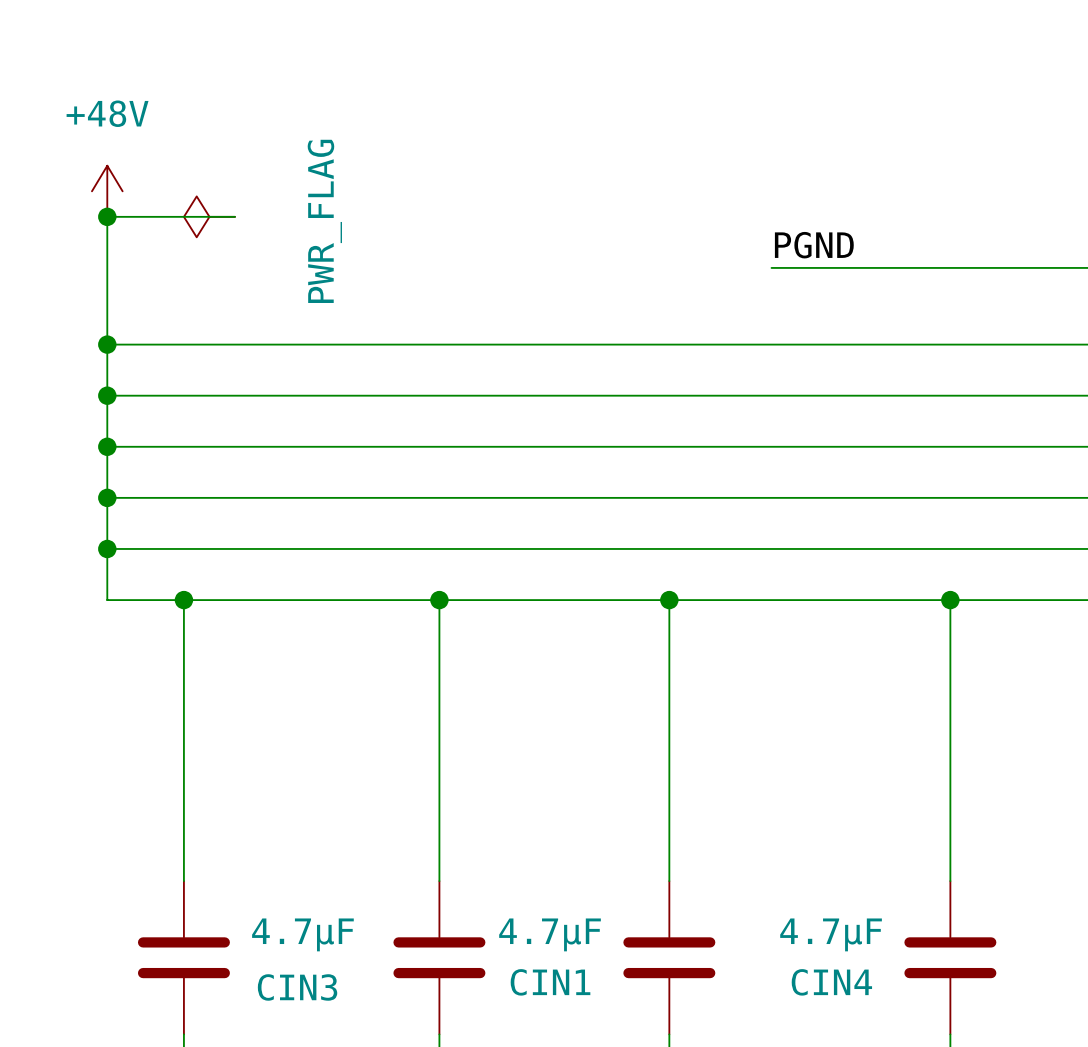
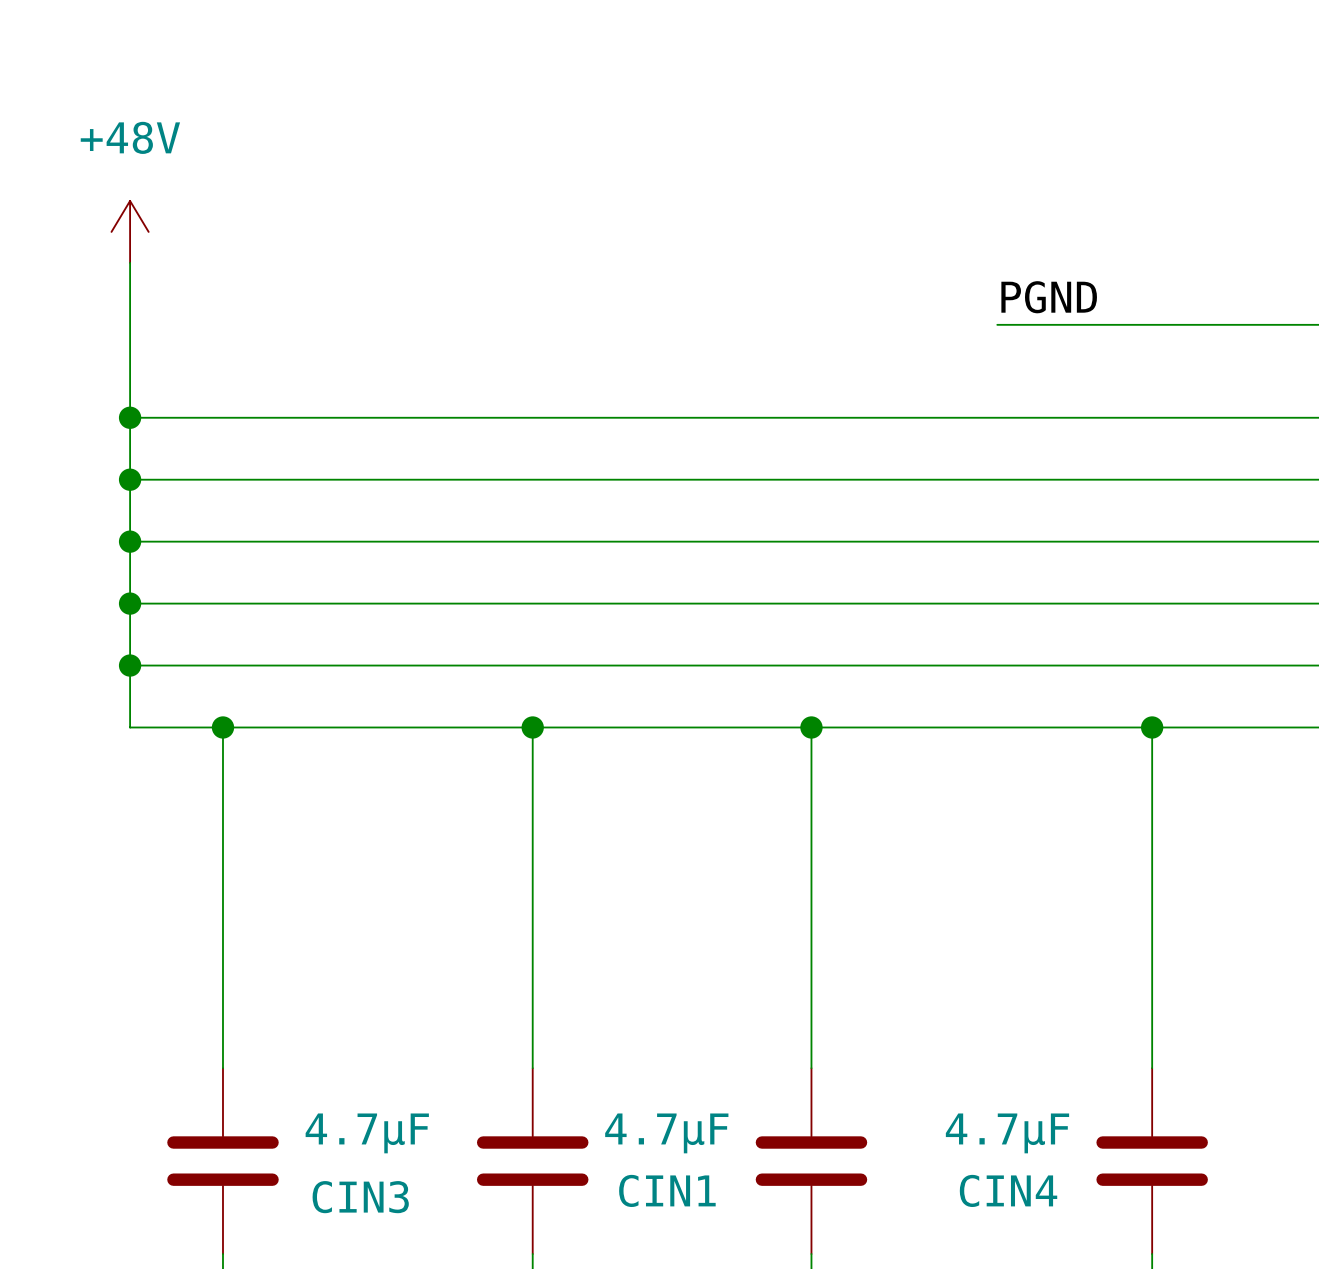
wire: (107, 216) (235, 216) -> none
junction: (107, 216) -> none
power symbol: PWR_FLAG (209, 216) -> none
label position: PGND (814, 245) -> PGND (1049, 297)
wire: (771, 267) (822, 267) -> none

